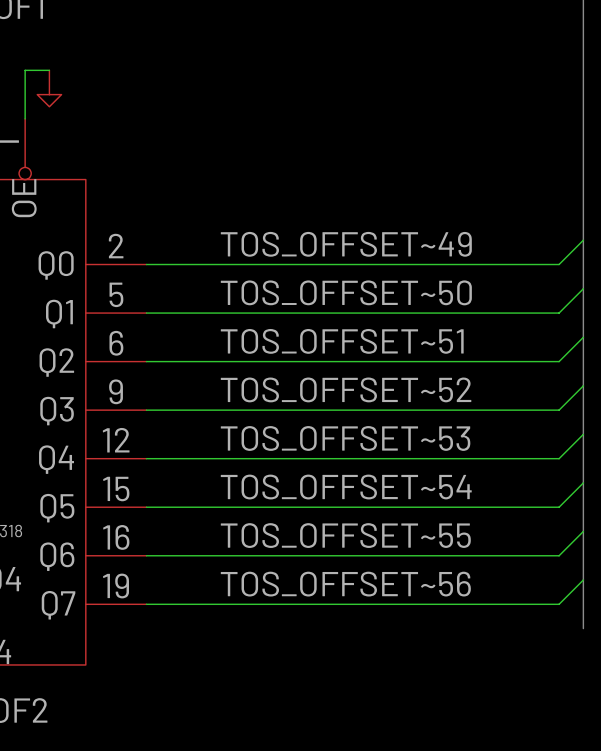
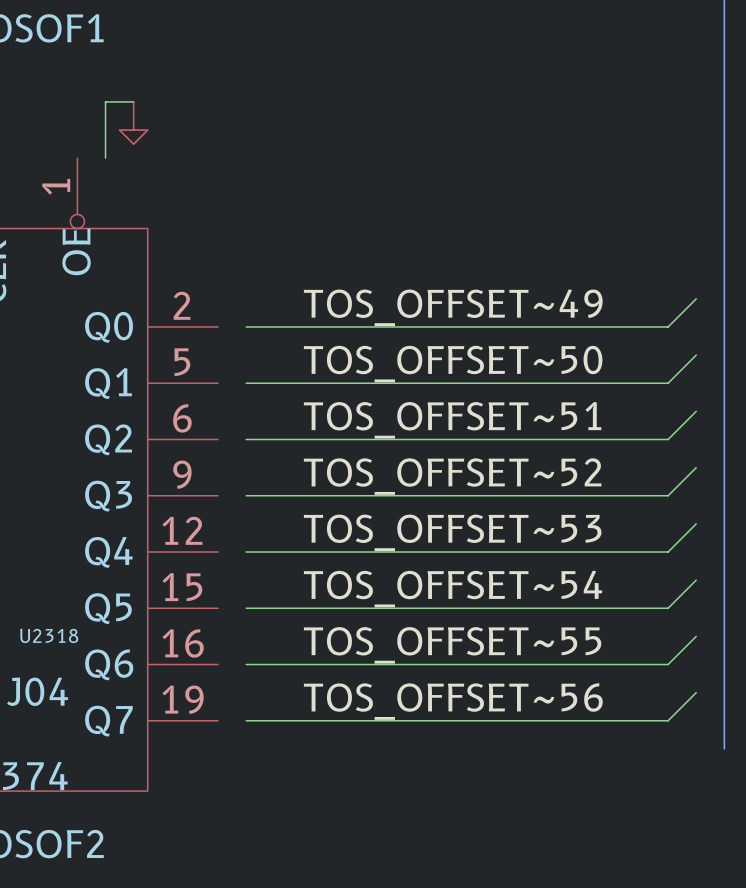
wire: (49, 70) (25, 70) (25, 118) -> (133, 101) (105, 101) (105, 158)
power symbol position: (49, 88) -> (133, 123)
wire: (583, 240) (559, 264) (534, 264) -> (696, 298) (668, 326)
wire: (146, 264) (170, 264) -> none
wire: (583, 288) (559, 313) (534, 313) -> (696, 355) (668, 383)
wire: (146, 313) (170, 313) -> none
wire: (583, 337) (559, 361) (534, 361) -> (696, 411) (668, 439)
wire: (146, 361) (170, 361) -> none
wire: (583, 385) (559, 410) (534, 410) -> (696, 467) (668, 495)
wire: (146, 410) (170, 410) -> none
wire: (583, 434) (559, 458) (534, 458) -> (696, 523) (668, 552)
wire: (146, 458) (170, 458) -> none
wire: (583, 482) (559, 507) (534, 507) -> (696, 580) (668, 608)
wire: (146, 507) (170, 507) -> none
wire: (583, 531) (559, 555) (534, 555) -> (696, 636) (668, 664)
wire: (146, 555) (170, 555) -> none
wire: (583, 580) (559, 604) (534, 604) -> (696, 692) (668, 720)
wire: (146, 604) (170, 604) -> none

